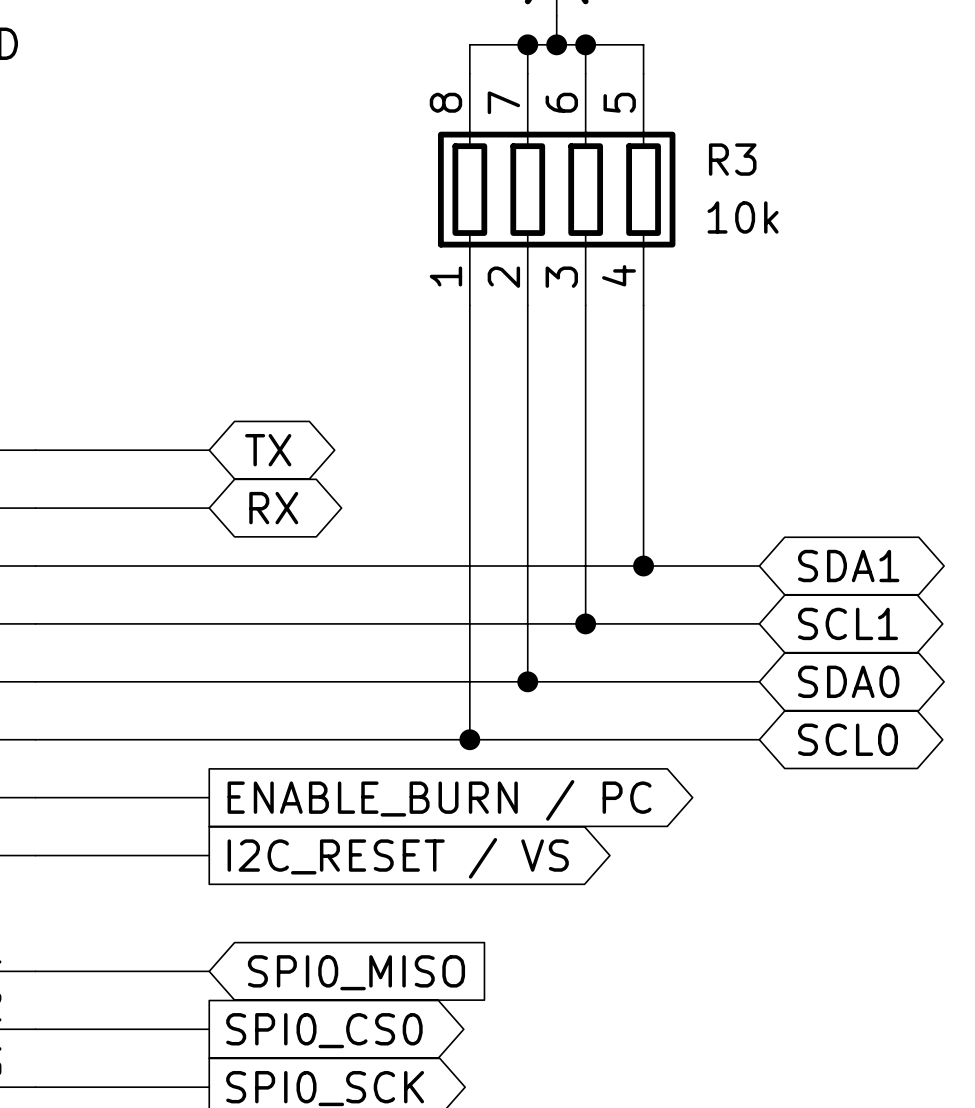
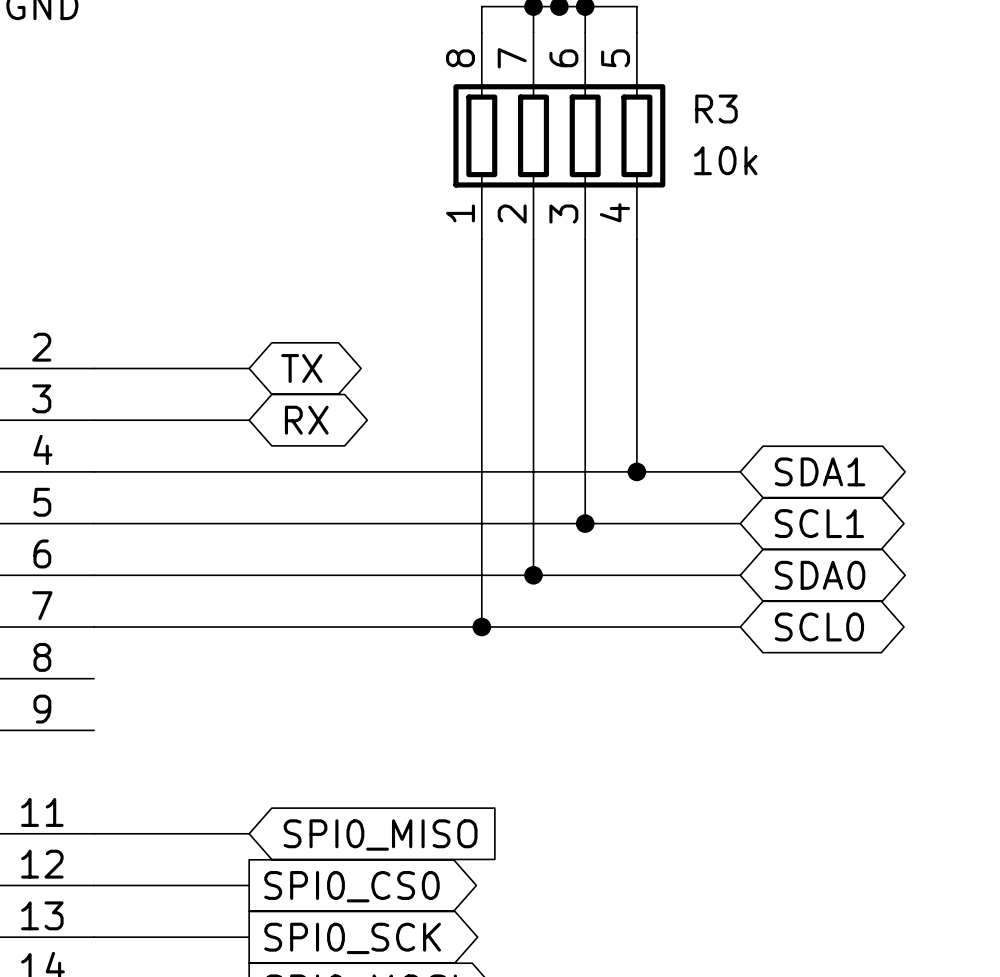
wire: (35, 797) (209, 797) -> none
global label: ENABLE_BURN / PC (439, 800) -> none
wire: (35, 855) (209, 855) -> none
global label: I2C_RESET / VS (398, 858) -> none

